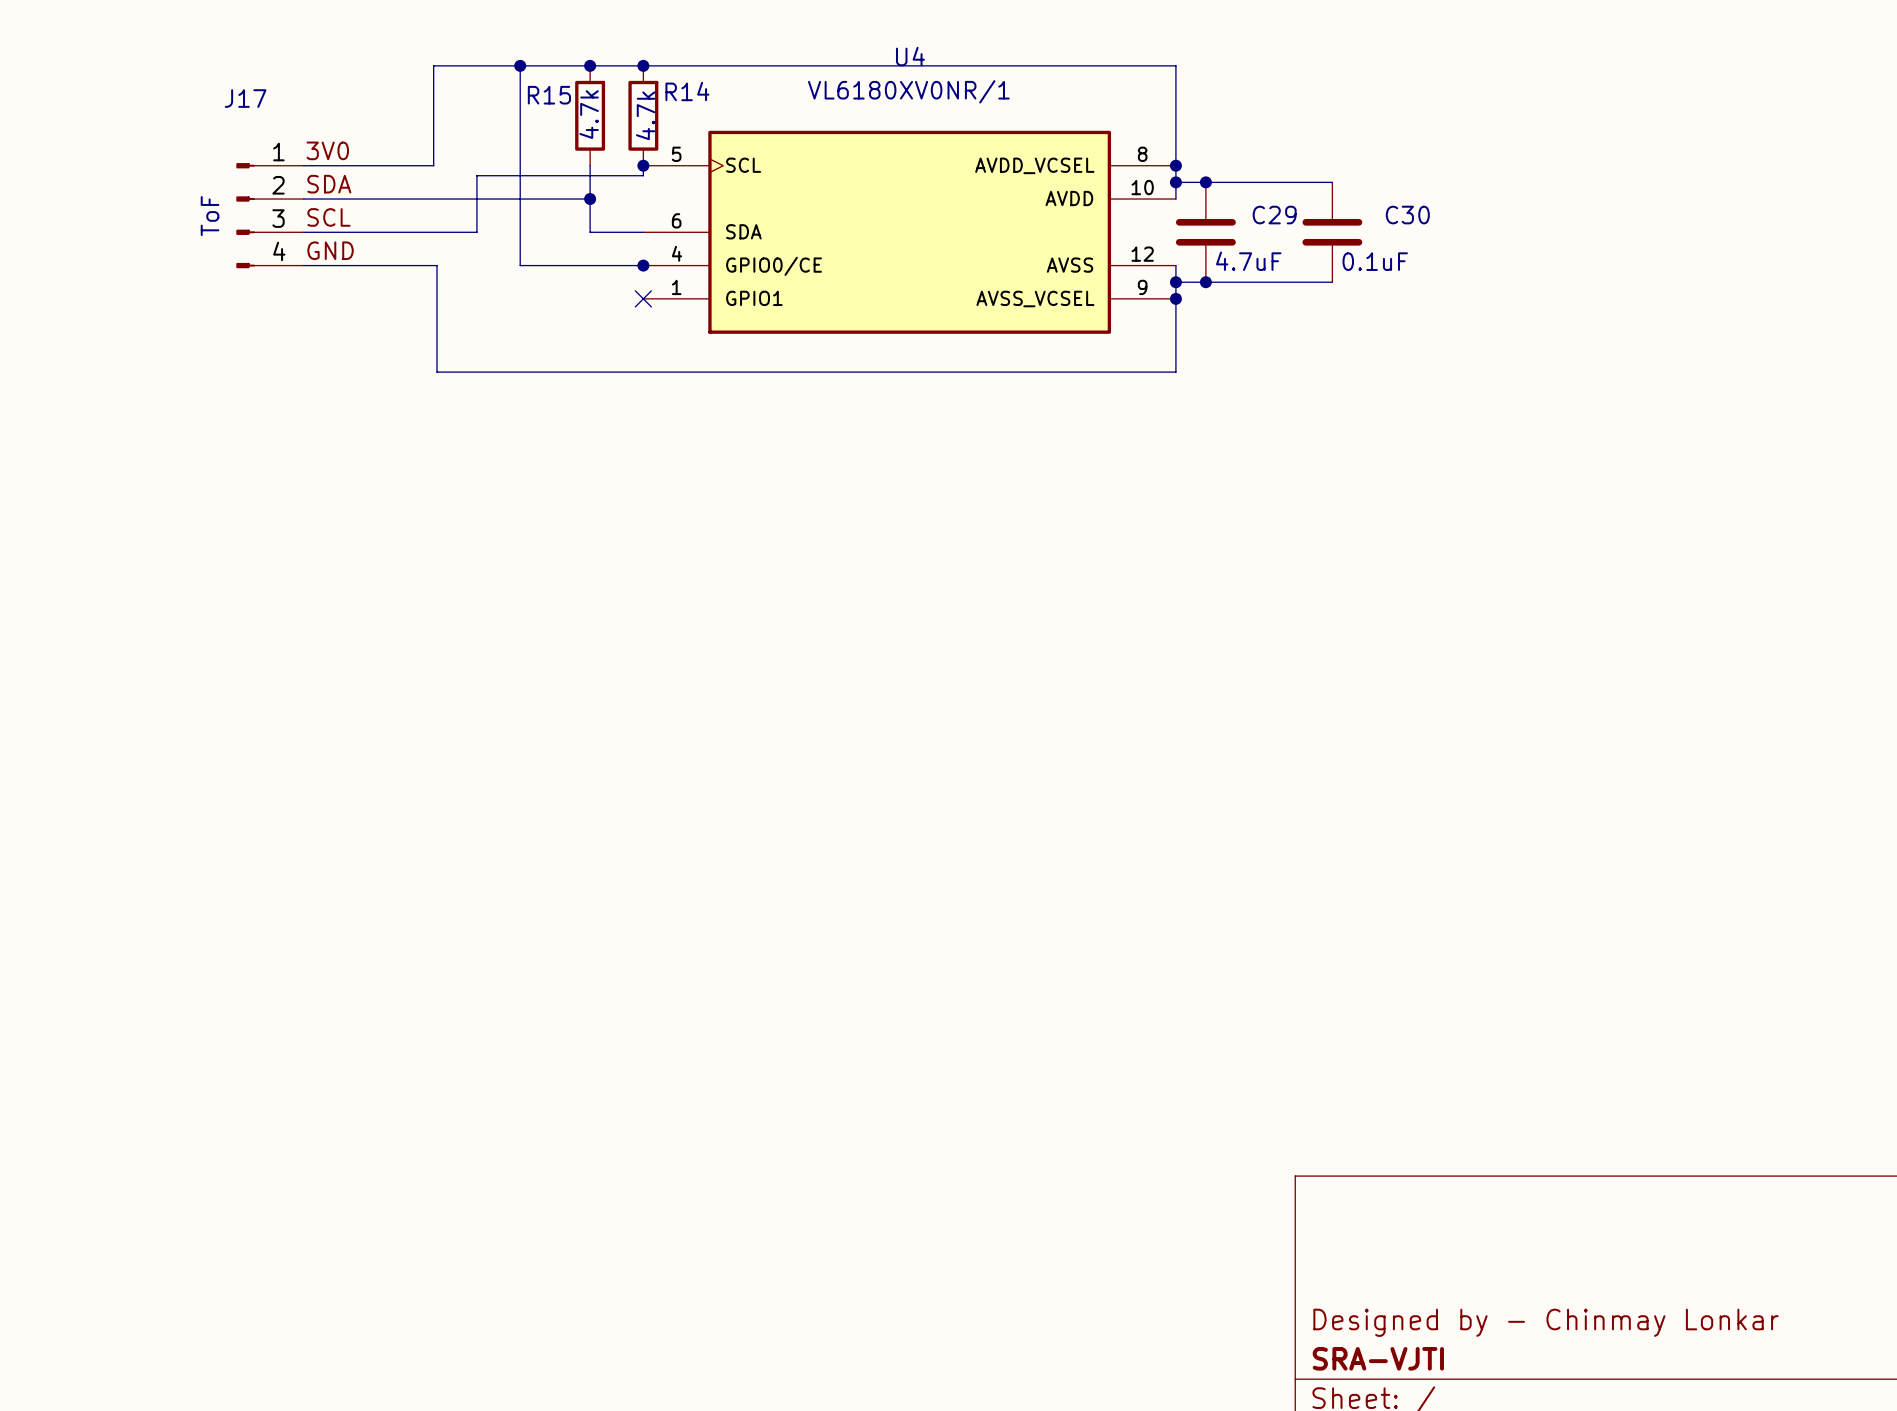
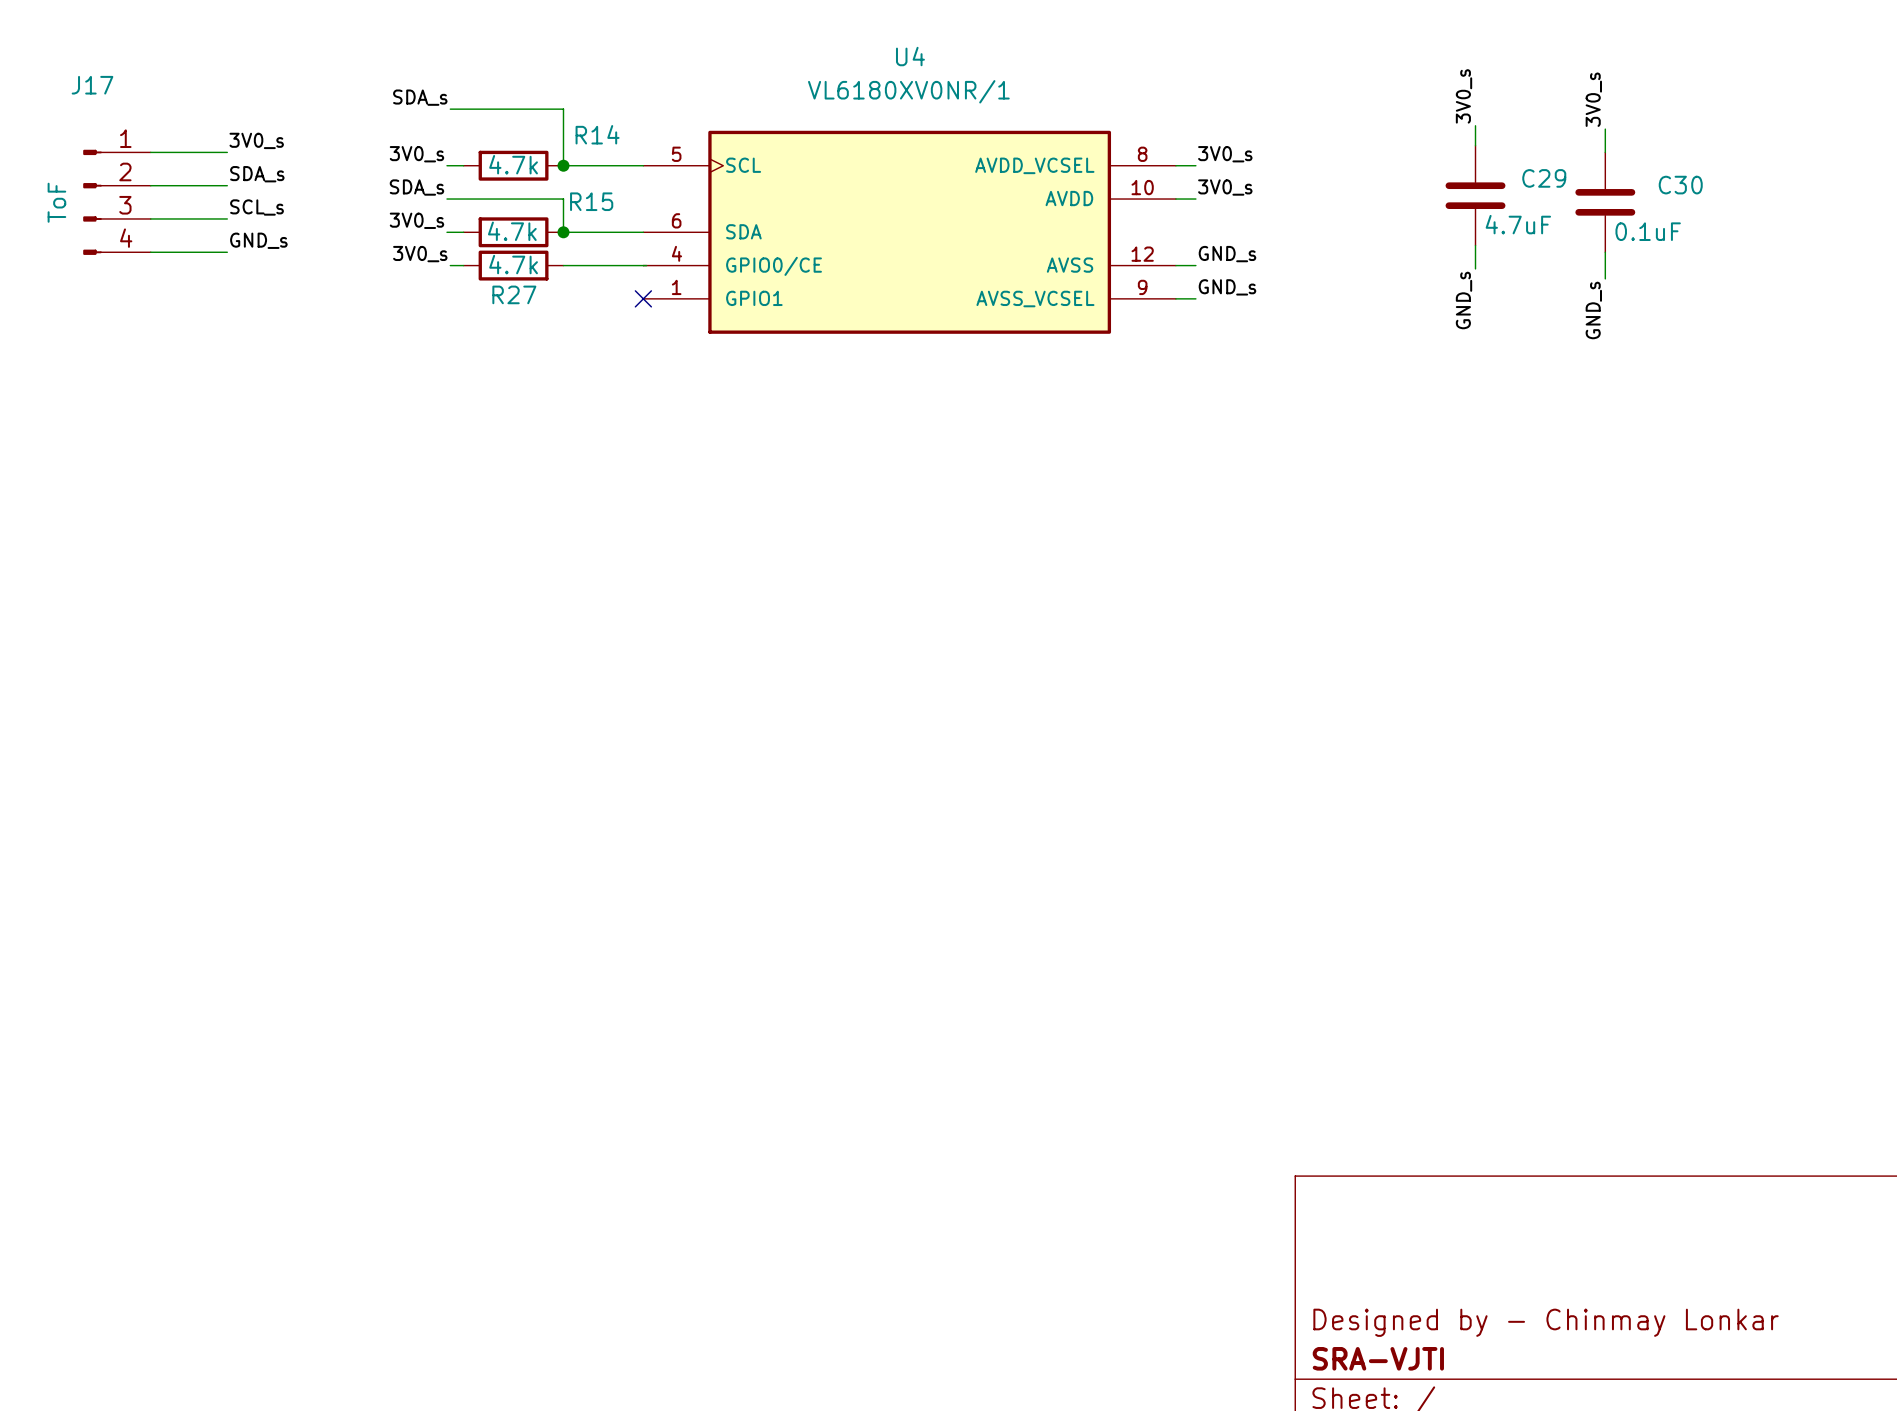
wire: (520, 65) (520, 265) (563, 265) -> none
junction: (520, 65) -> none
junction: (590, 65) -> none
junction: (643, 65) -> none
R14 name position: R14 (687, 91) -> R14 (597, 134)
R15 name position: R15 (549, 95) -> R15 (591, 201)
label: none -> 3V0_s (1464, 96)
label: none -> SDA_s (420, 97)
label: none -> 3V0_s (1593, 99)
R15 rotation: 0° (590, 115) -> 90° clockwise (513, 232)
R15 position: (590, 115) -> (513, 232)
R14 rotation: 0° (643, 115) -> 90° clockwise (513, 165)
R14 position: (643, 115) -> (513, 165)
wire: none -> (1475, 125) (1475, 145)
wire: none -> (1605, 129) (1605, 152)
label: none -> 3V0_s (256, 140)
label: 3V0 (327, 150) -> none
wire: none -> (150, 152) (227, 152)
label: none -> 3V0_s (416, 154)
label: none -> 3V0_s (1225, 154)
wire: (303, 165) (433, 165) (433, 65) (1175, 65) (1175, 199) -> (1195, 199) (1175, 199)
wire: none -> (446, 165) (463, 165)
junction: none -> (563, 165)
wire: (590, 165) (590, 232) -> none
wire: (643, 165) (643, 175) (476, 175) (476, 232) (463, 232) -> (643, 165) (563, 165) (563, 109) (450, 109)
junction: (643, 165) -> none
wire: none -> (1175, 165) (1195, 165)
junction: (1175, 165) -> none
label: none -> SDA_s (257, 174)
wire: (1175, 182) (1332, 182) -> none
junction: (1175, 182) -> none
junction: (1205, 182) -> none
label: SDA (329, 184) -> none
wire: none -> (150, 185) (227, 185)
label: none -> SDA_s (416, 187)
label: none -> 3V0_s (1225, 187)
wire: (303, 199) (446, 199) -> none
wire: (563, 199) (590, 199) -> (563, 199) (563, 232) (590, 232)
junction: (590, 199) -> none
label: none -> SCL_s (257, 207)
J17 position: (270, 215) -> (116, 202)
label: SCL (328, 217) -> none
wire: none -> (150, 218) (227, 218)
label: none -> 3V0_s (416, 220)
wire: (303, 232) (446, 232) -> none
junction: none -> (563, 232)
C29 position: (1205, 232) -> (1475, 195)
C30 position: (1332, 232) -> (1605, 202)
label: none -> GND_s (258, 240)
wire: none -> (1475, 245) (1475, 268)
label: GND (330, 250) -> none
wire: none -> (150, 252) (227, 252)
wire: none -> (1605, 252) (1605, 278)
label: none -> 3V0_s (420, 254)
label: none -> GND_s (1227, 254)
wire: (303, 265) (437, 265) (437, 372) (1175, 372) (1175, 265) -> (1195, 265) (1175, 265)
wire: none -> (450, 265) (463, 265)
R27: none -> 4.7k (513, 265)
junction: (643, 265) -> none
wire: (1175, 282) (1332, 282) -> none
junction: (1175, 282) -> none
junction: (1205, 282) -> none
label: none -> GND_s (1227, 287)
wire: none -> (1175, 298) (1195, 298)
junction: (1175, 298) -> none
label: none -> GND_s (1464, 300)
label: none -> GND_s (1593, 310)

